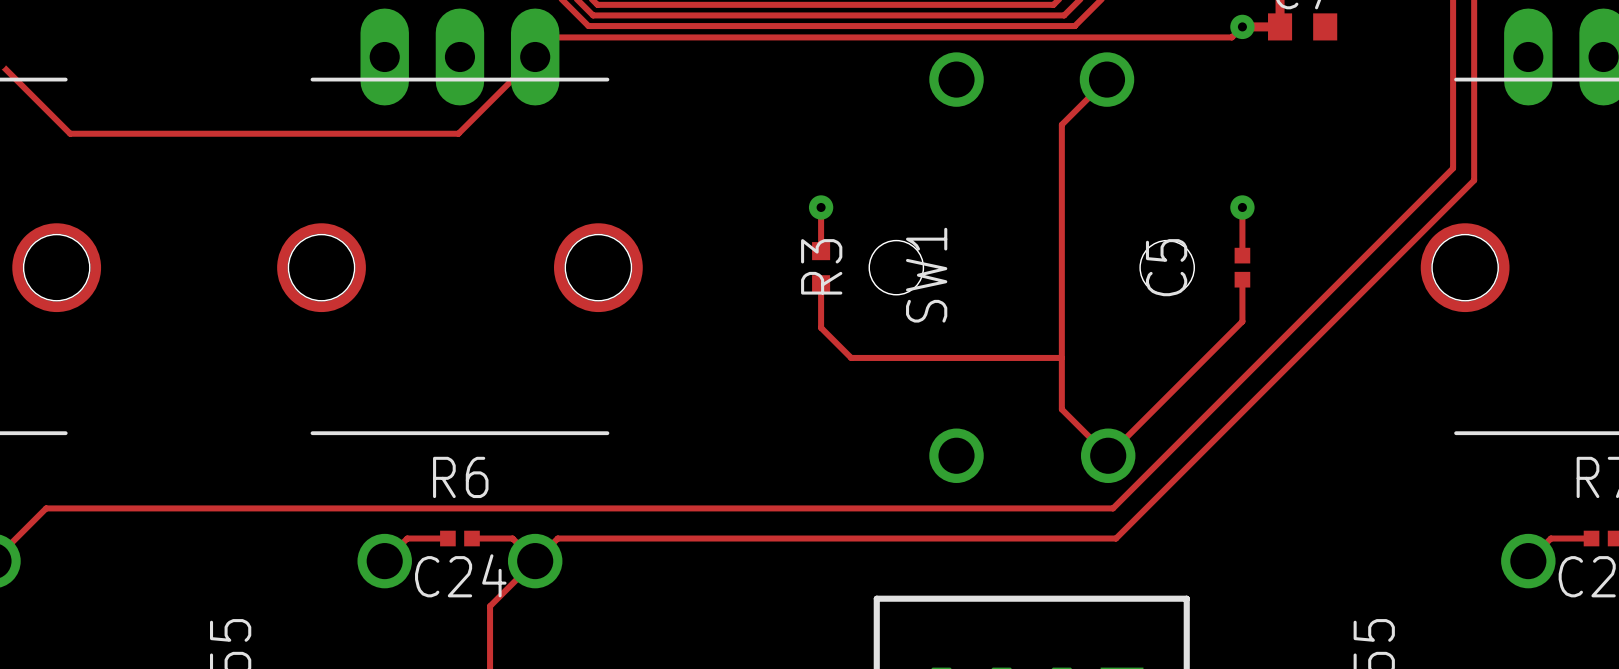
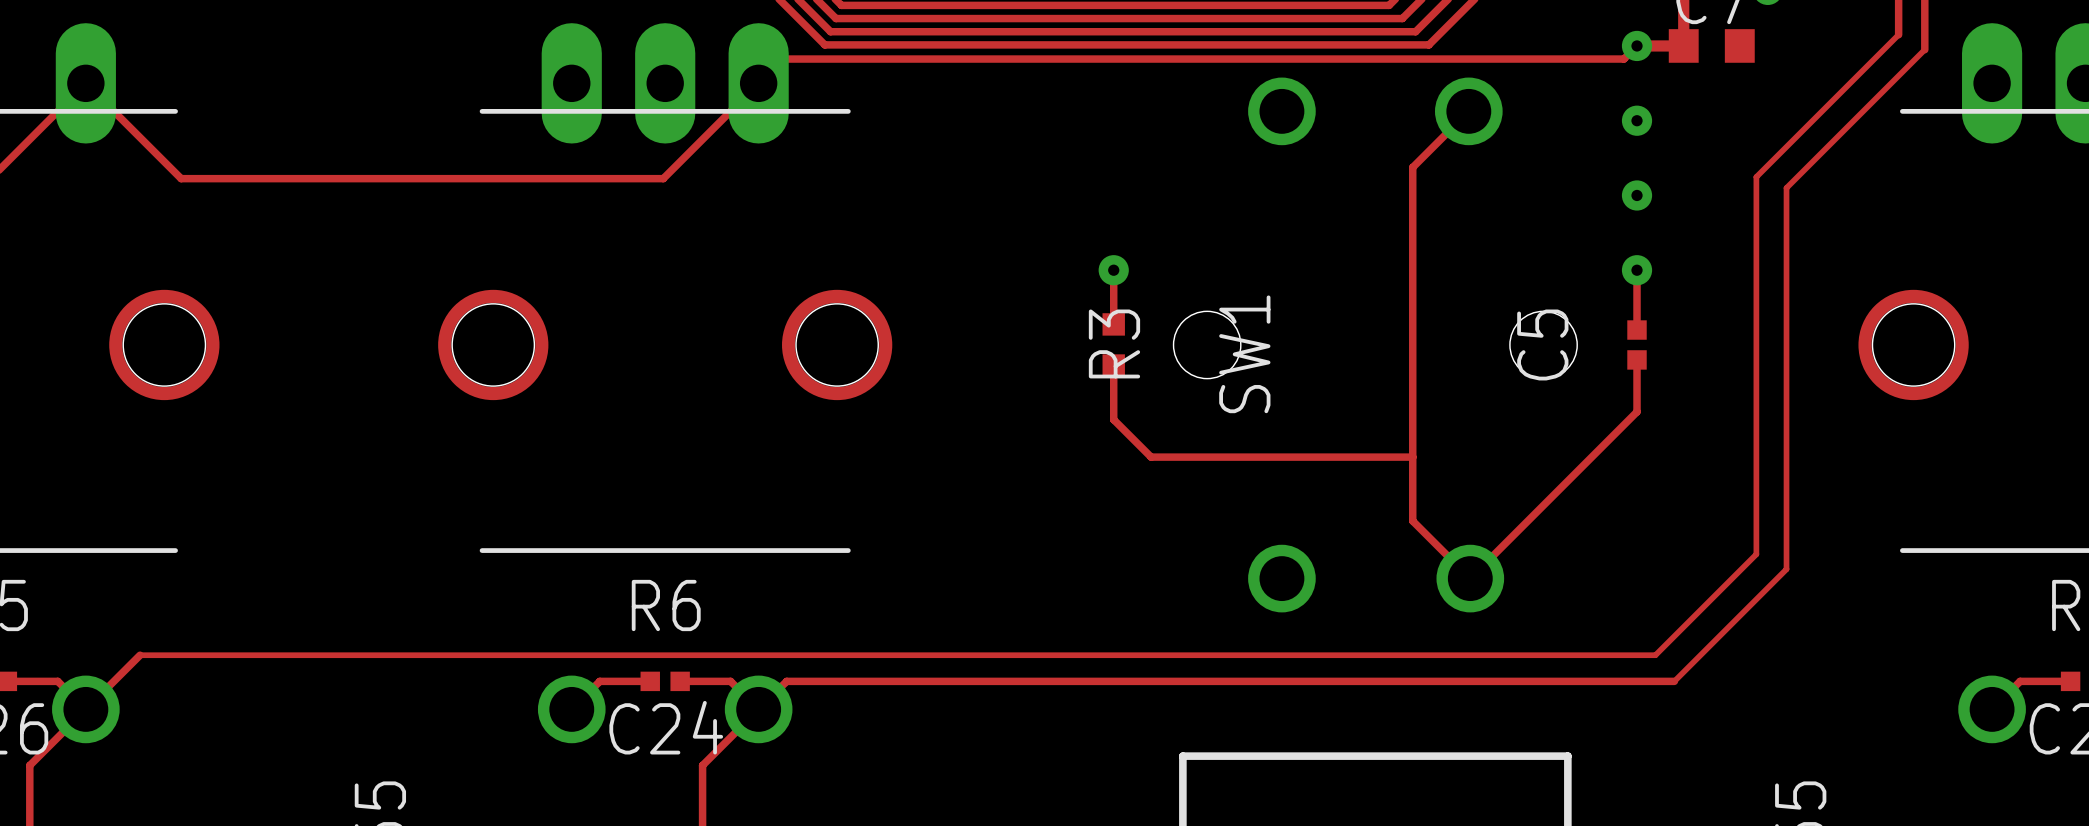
track: (1453, 17) (1453, 168) (1113, 508) (46, 508) (37, 517) -> (1898, 34) (1756, 177) (1756, 554) (1655, 655) (140, 655)
track: (1474, 29) (1474, 180) (1116, 538) -> (1924, 49) (1786, 187) (1786, 569) (1674, 681) (1480, 681)
via: none -> (1637, 120)
via: none -> (1637, 195)

